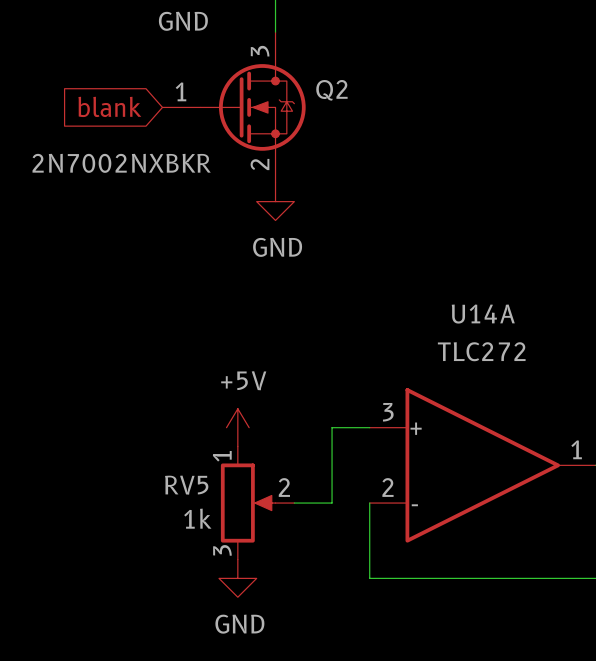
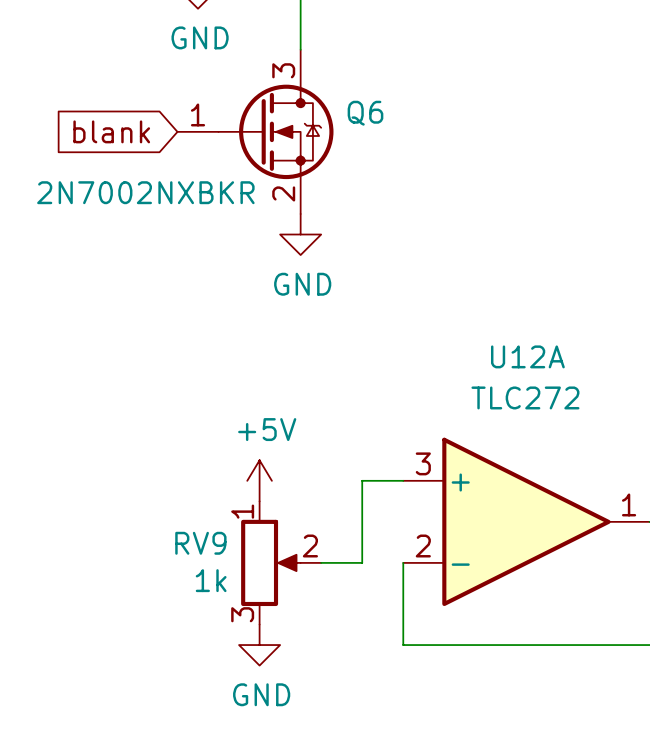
Q2 name: Q2 (331, 90) -> Q6 (365, 113)
U14A name: U14A (483, 314) -> U12A (527, 356)
RV5 name: RV5 (186, 485) -> RV9 (200, 543)

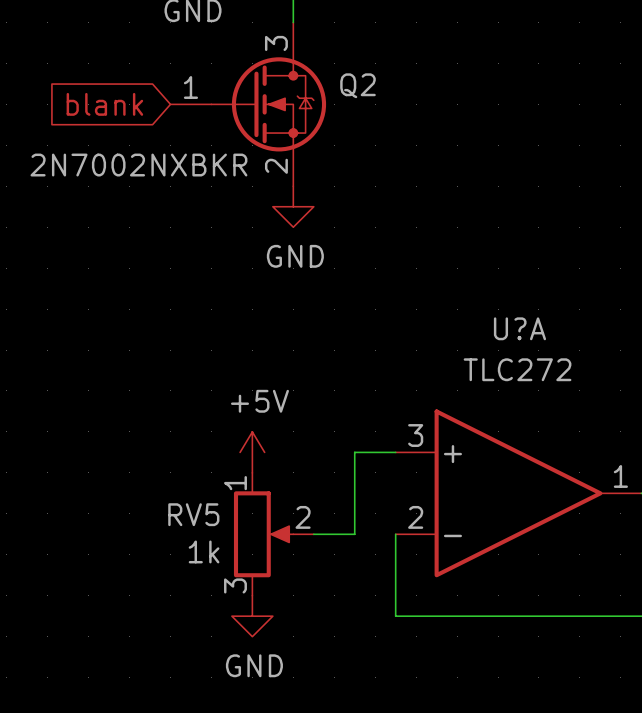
Q6 name: Q6 (365, 113) -> Q2 (357, 85)
U12A name: U12A (527, 356) -> U?A (519, 328)
RV9 name: RV9 (200, 543) -> RV5 (193, 514)

